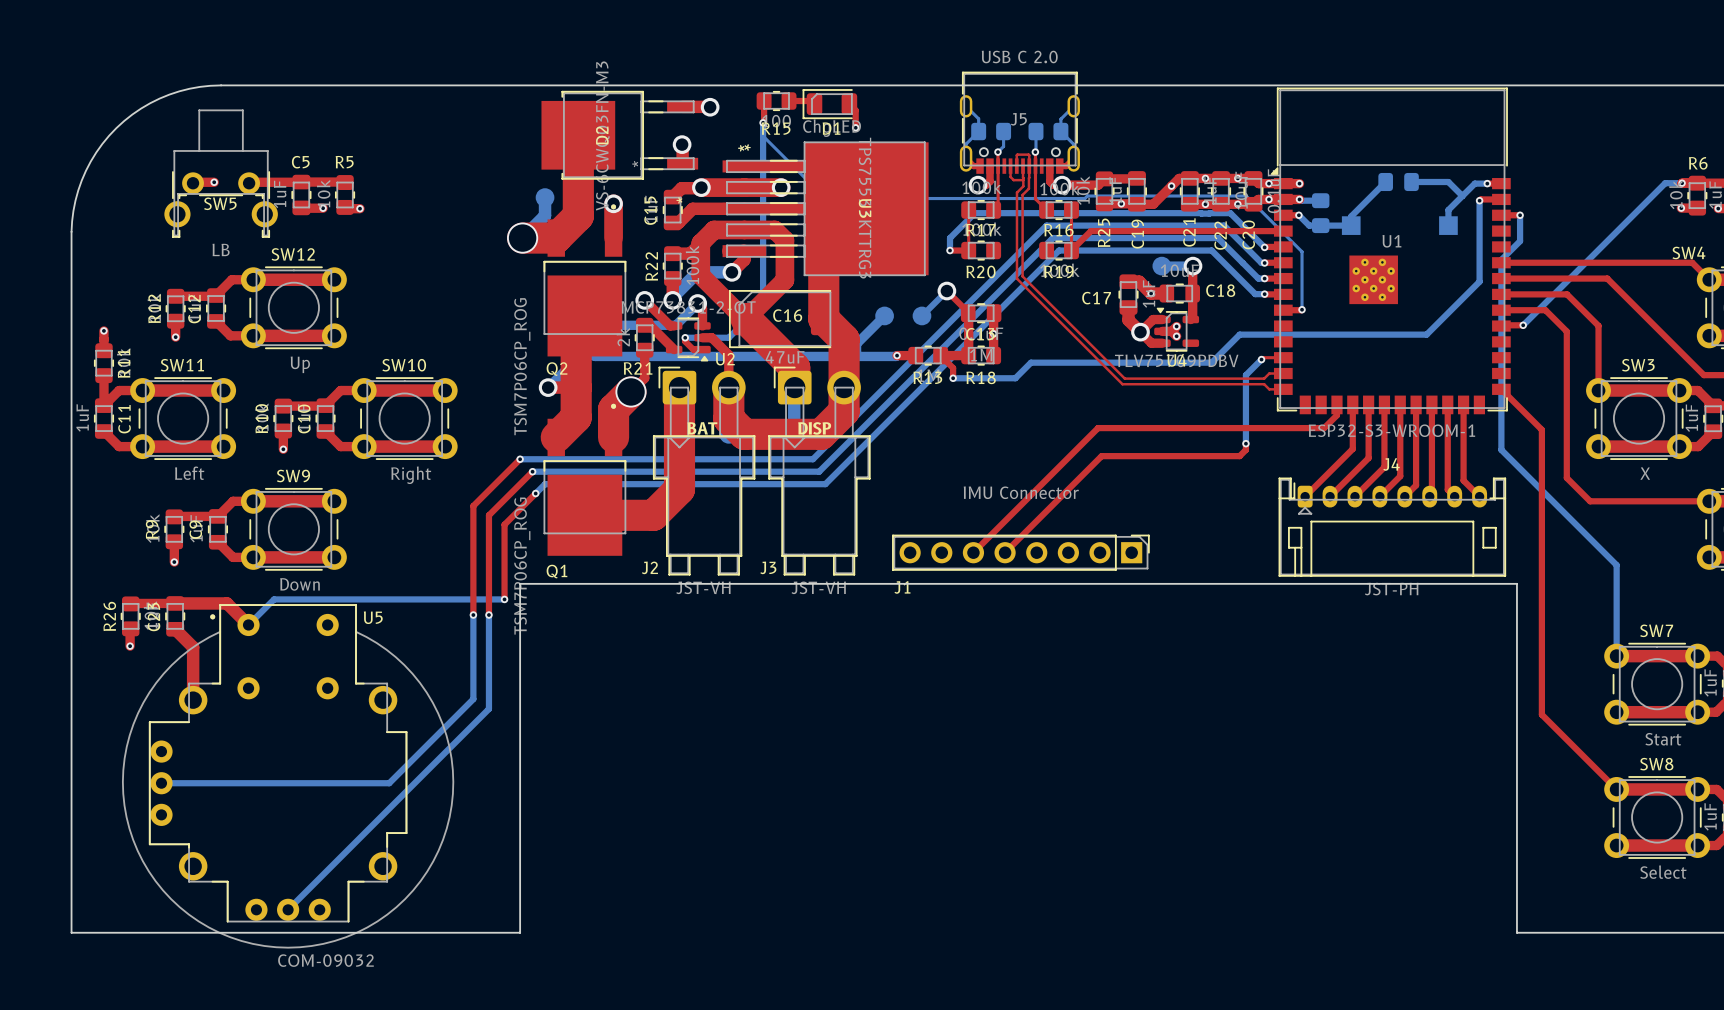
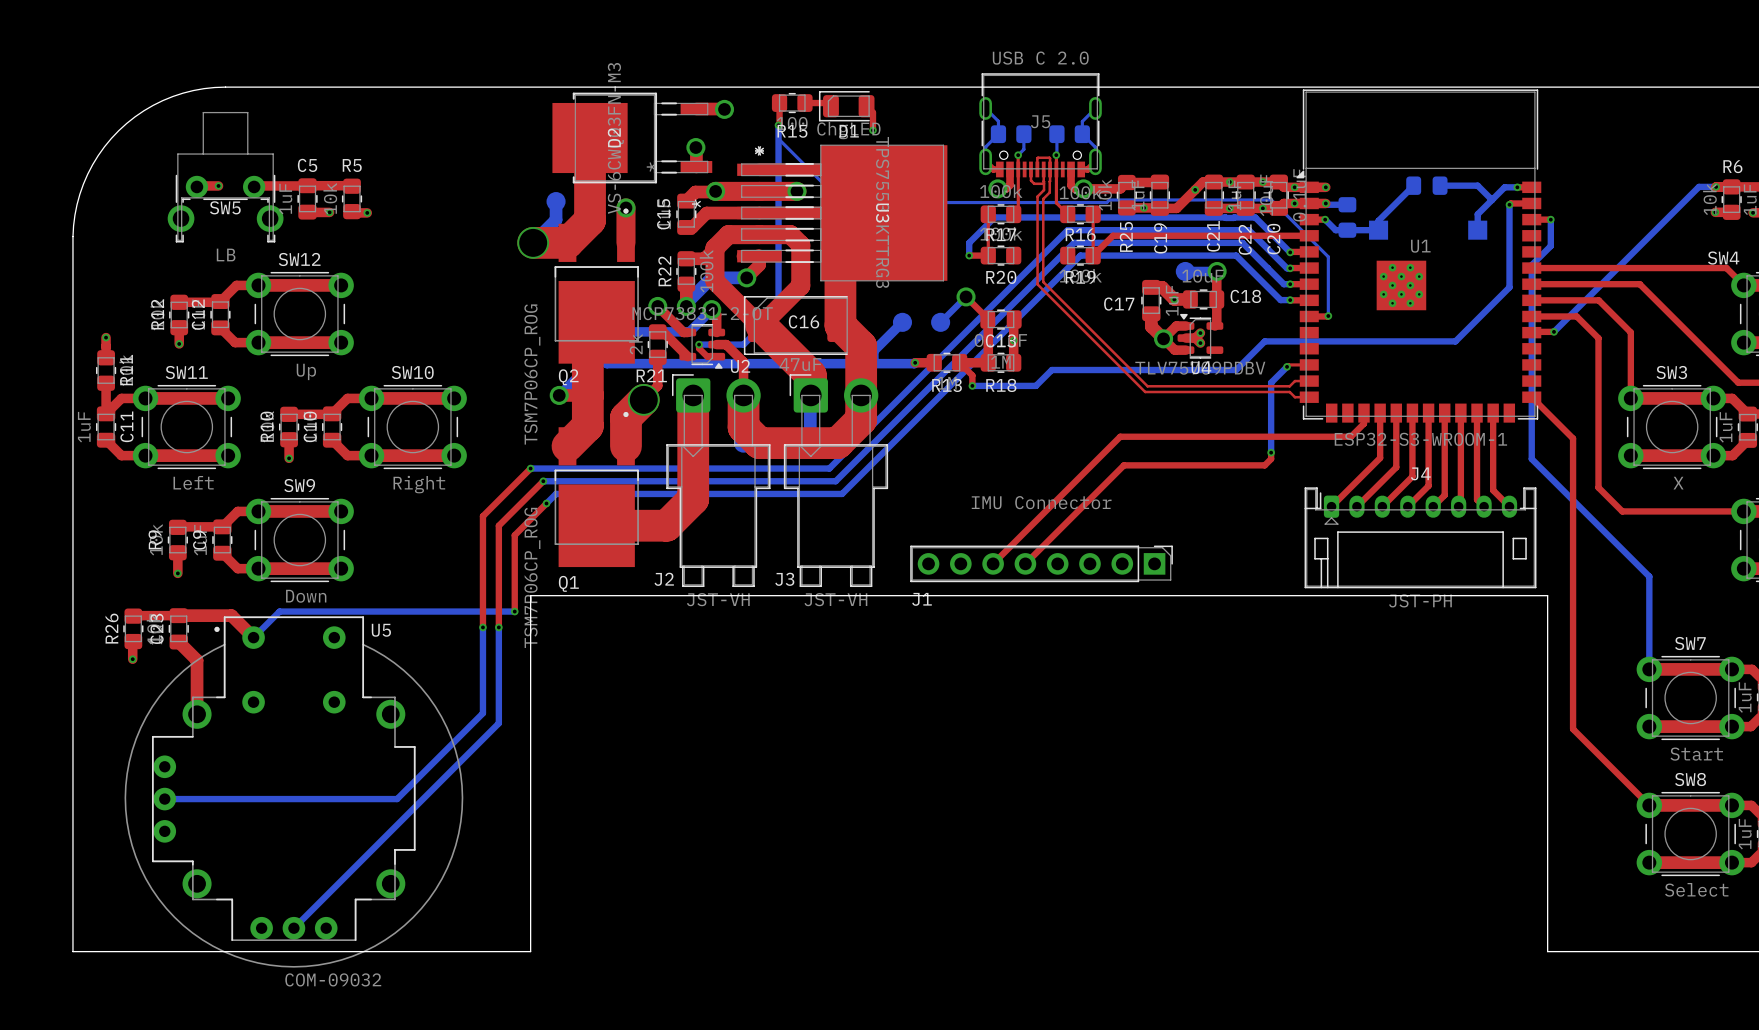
text: BAT (702, 428) -> none
text: DISP (814, 428) -> none

